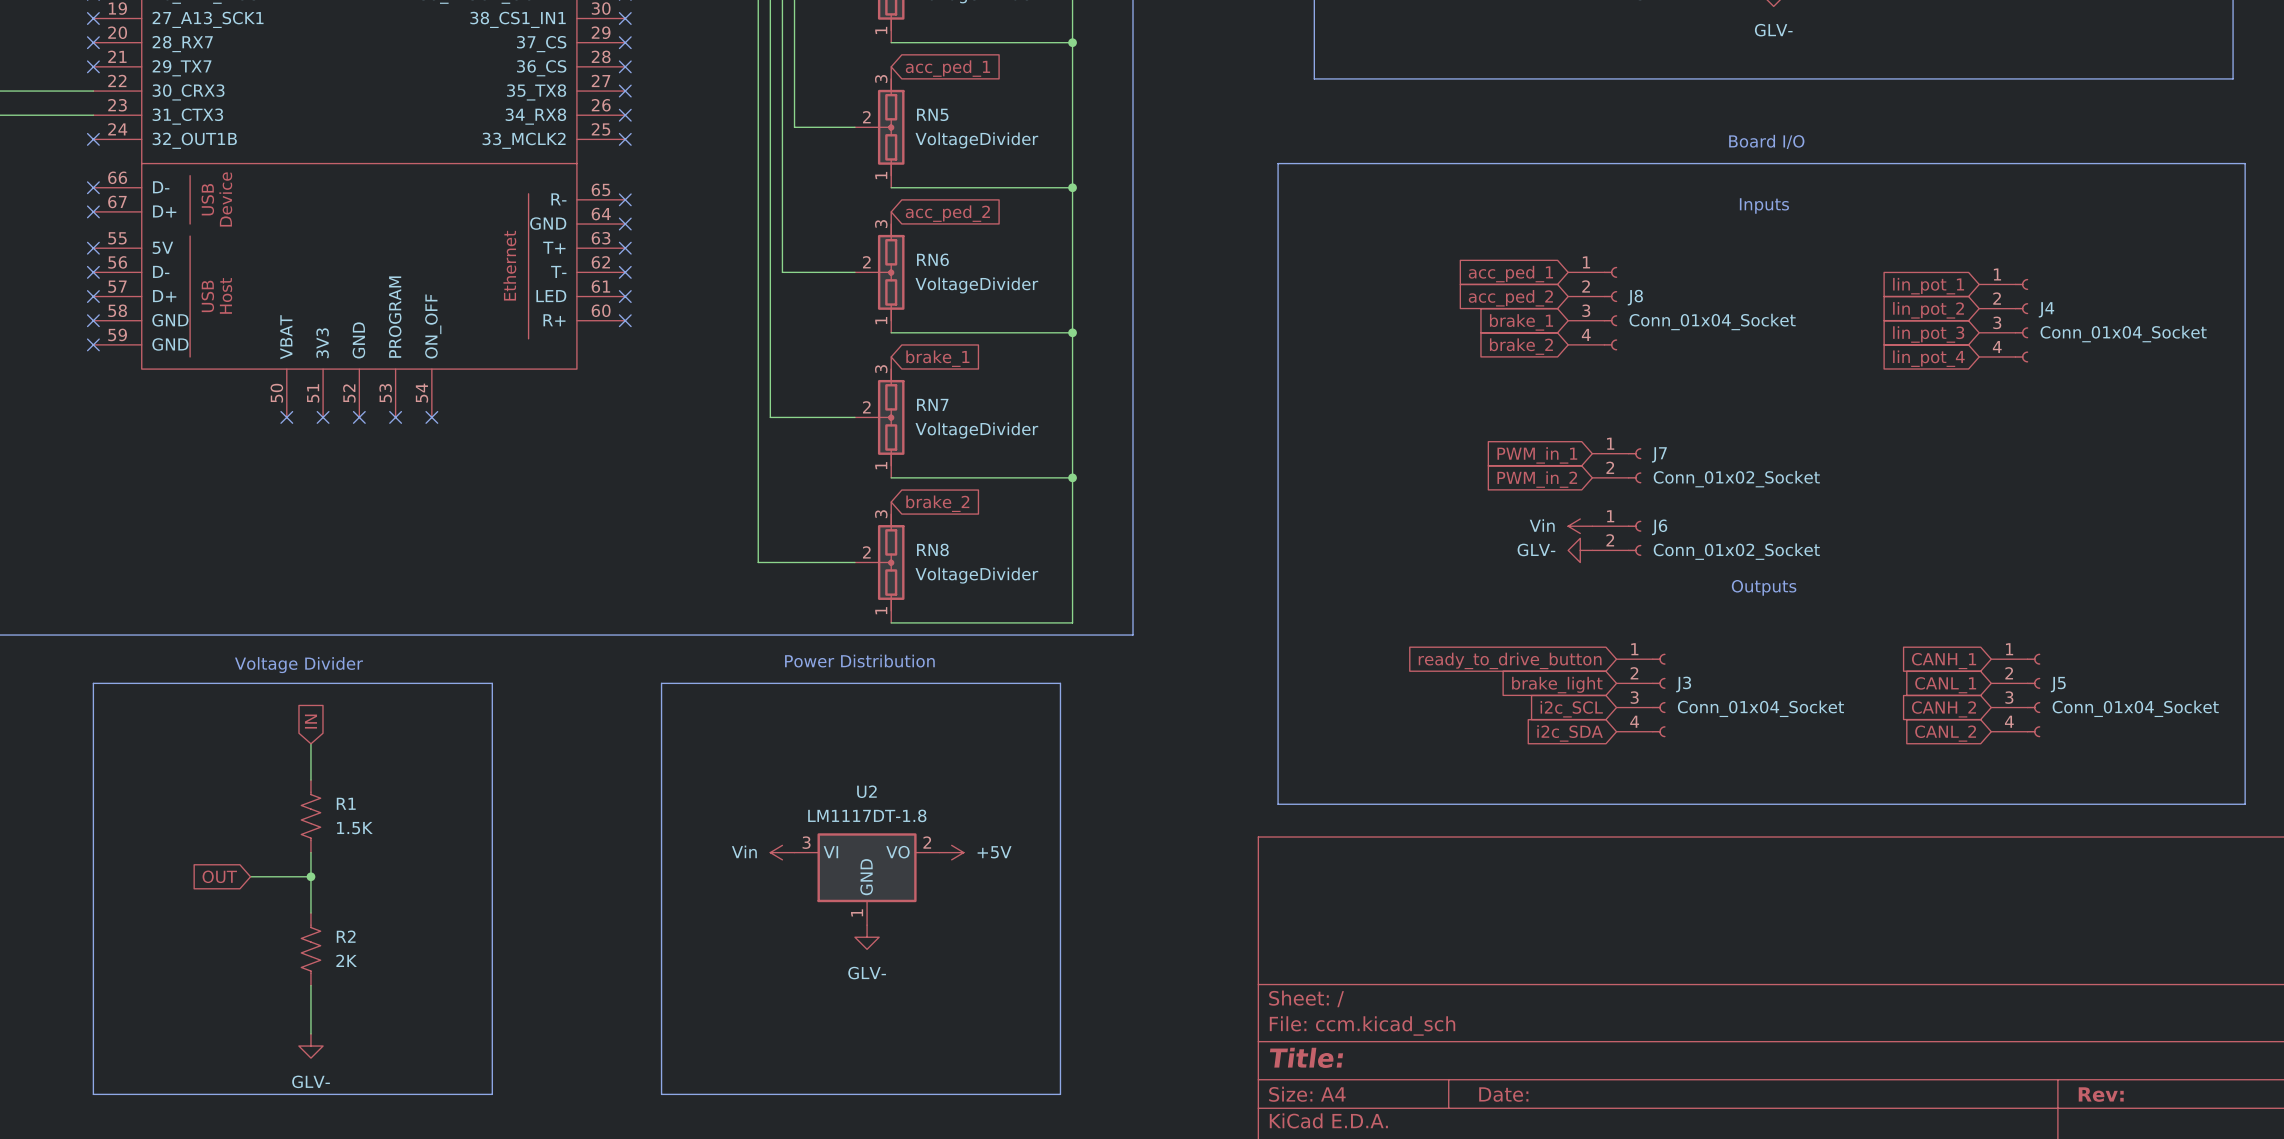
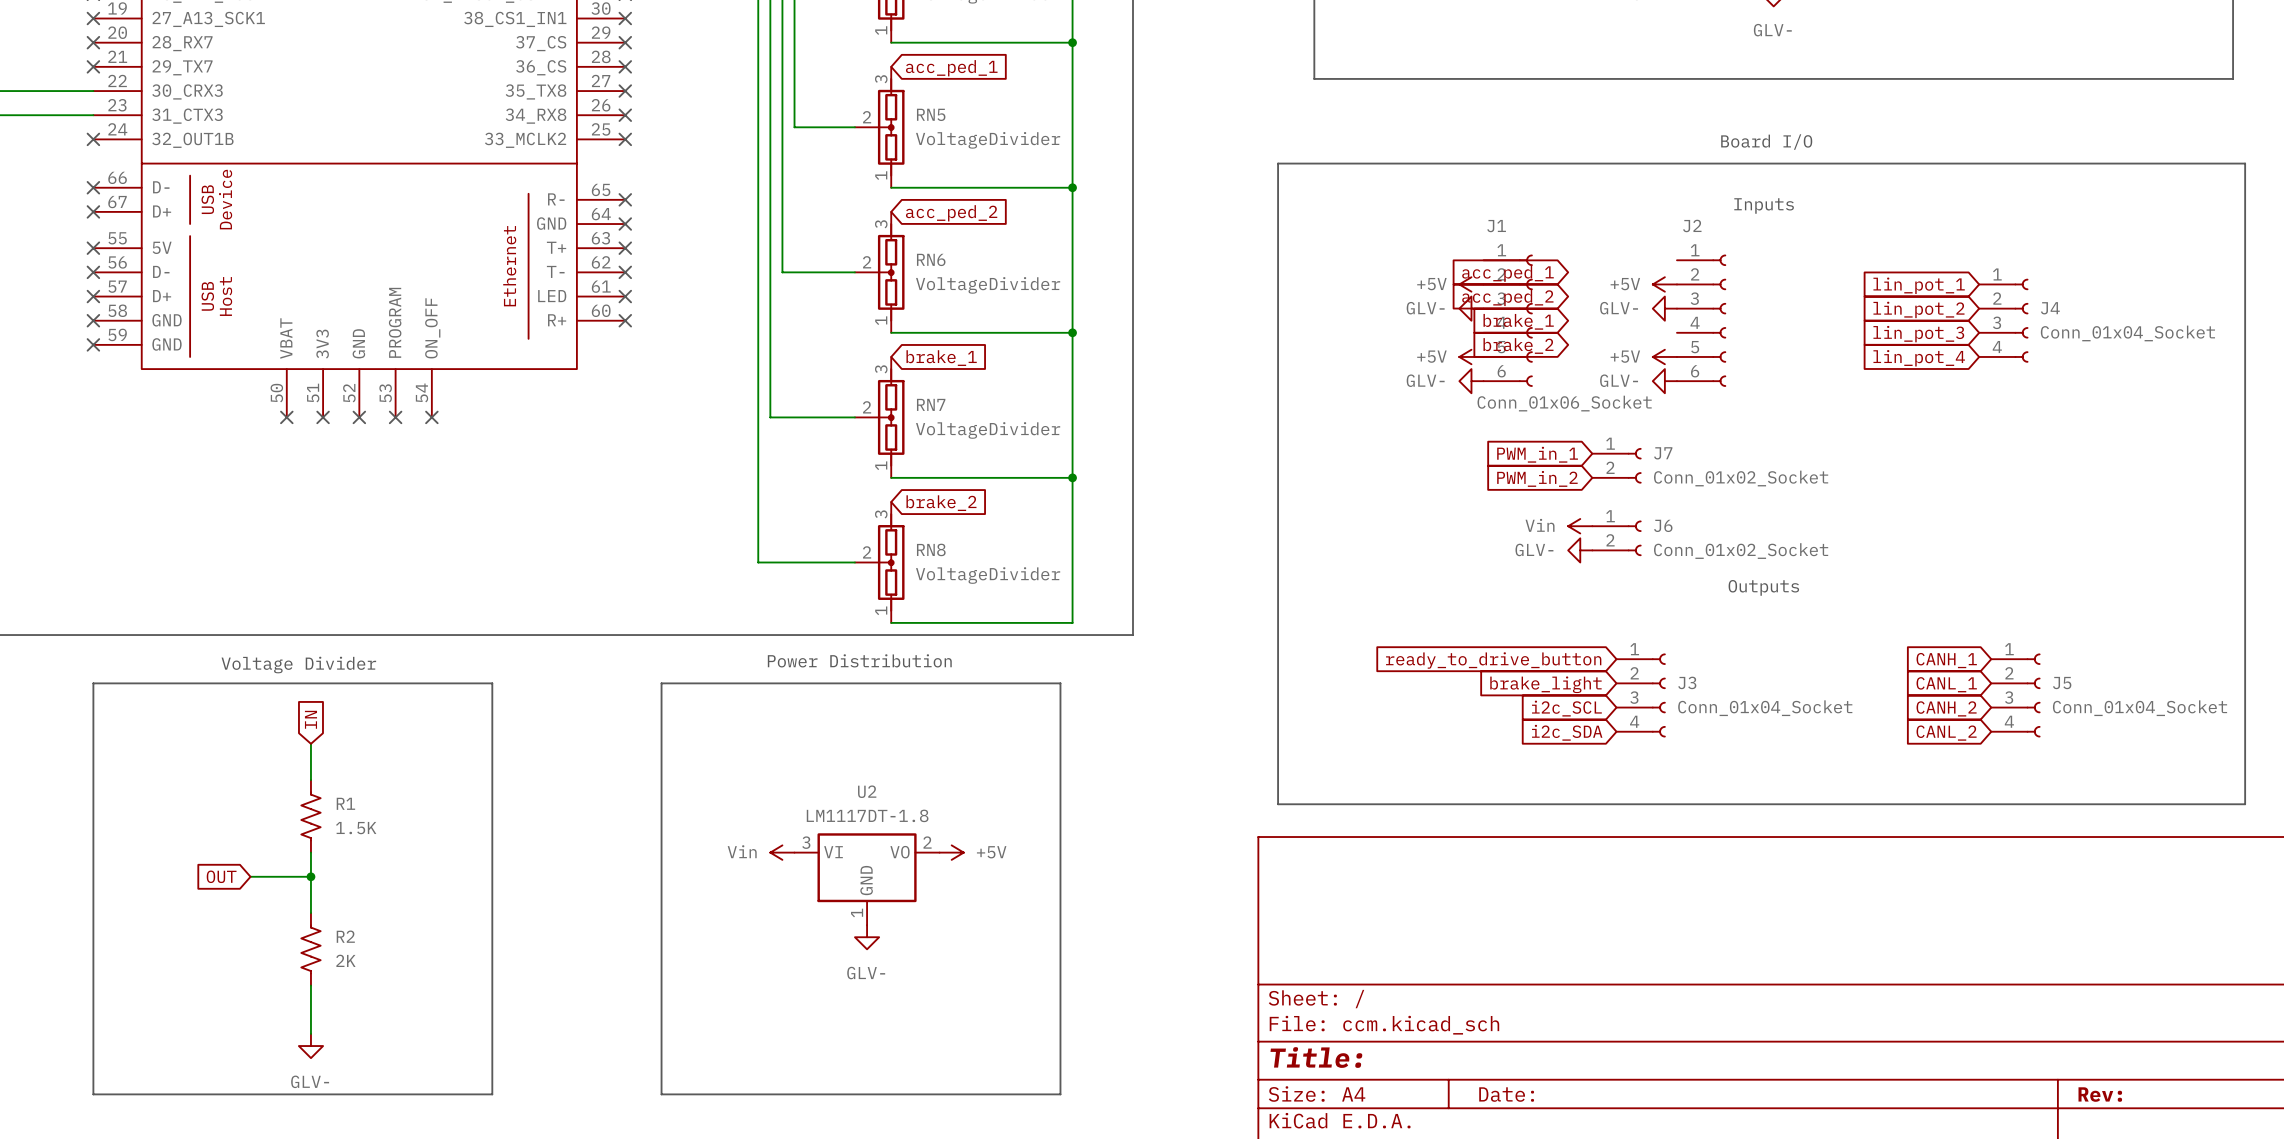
power symbol: none -> +5V (1471, 284)
power symbol: none -> +5V (1664, 284)
power symbol: none -> GLV- (1471, 308)
J8: Conn_01x04_Socket (1592, 308) -> none
power symbol: none -> GLV- (1664, 308)
J1: none -> Conn_01x06_Socket (1508, 320)
J2: none -> (1701, 320)
power symbol: none -> +5V (1471, 356)
power symbol: none -> +5V (1664, 356)
power symbol: none -> GLV- (1471, 381)
power symbol: none -> GLV- (1664, 381)

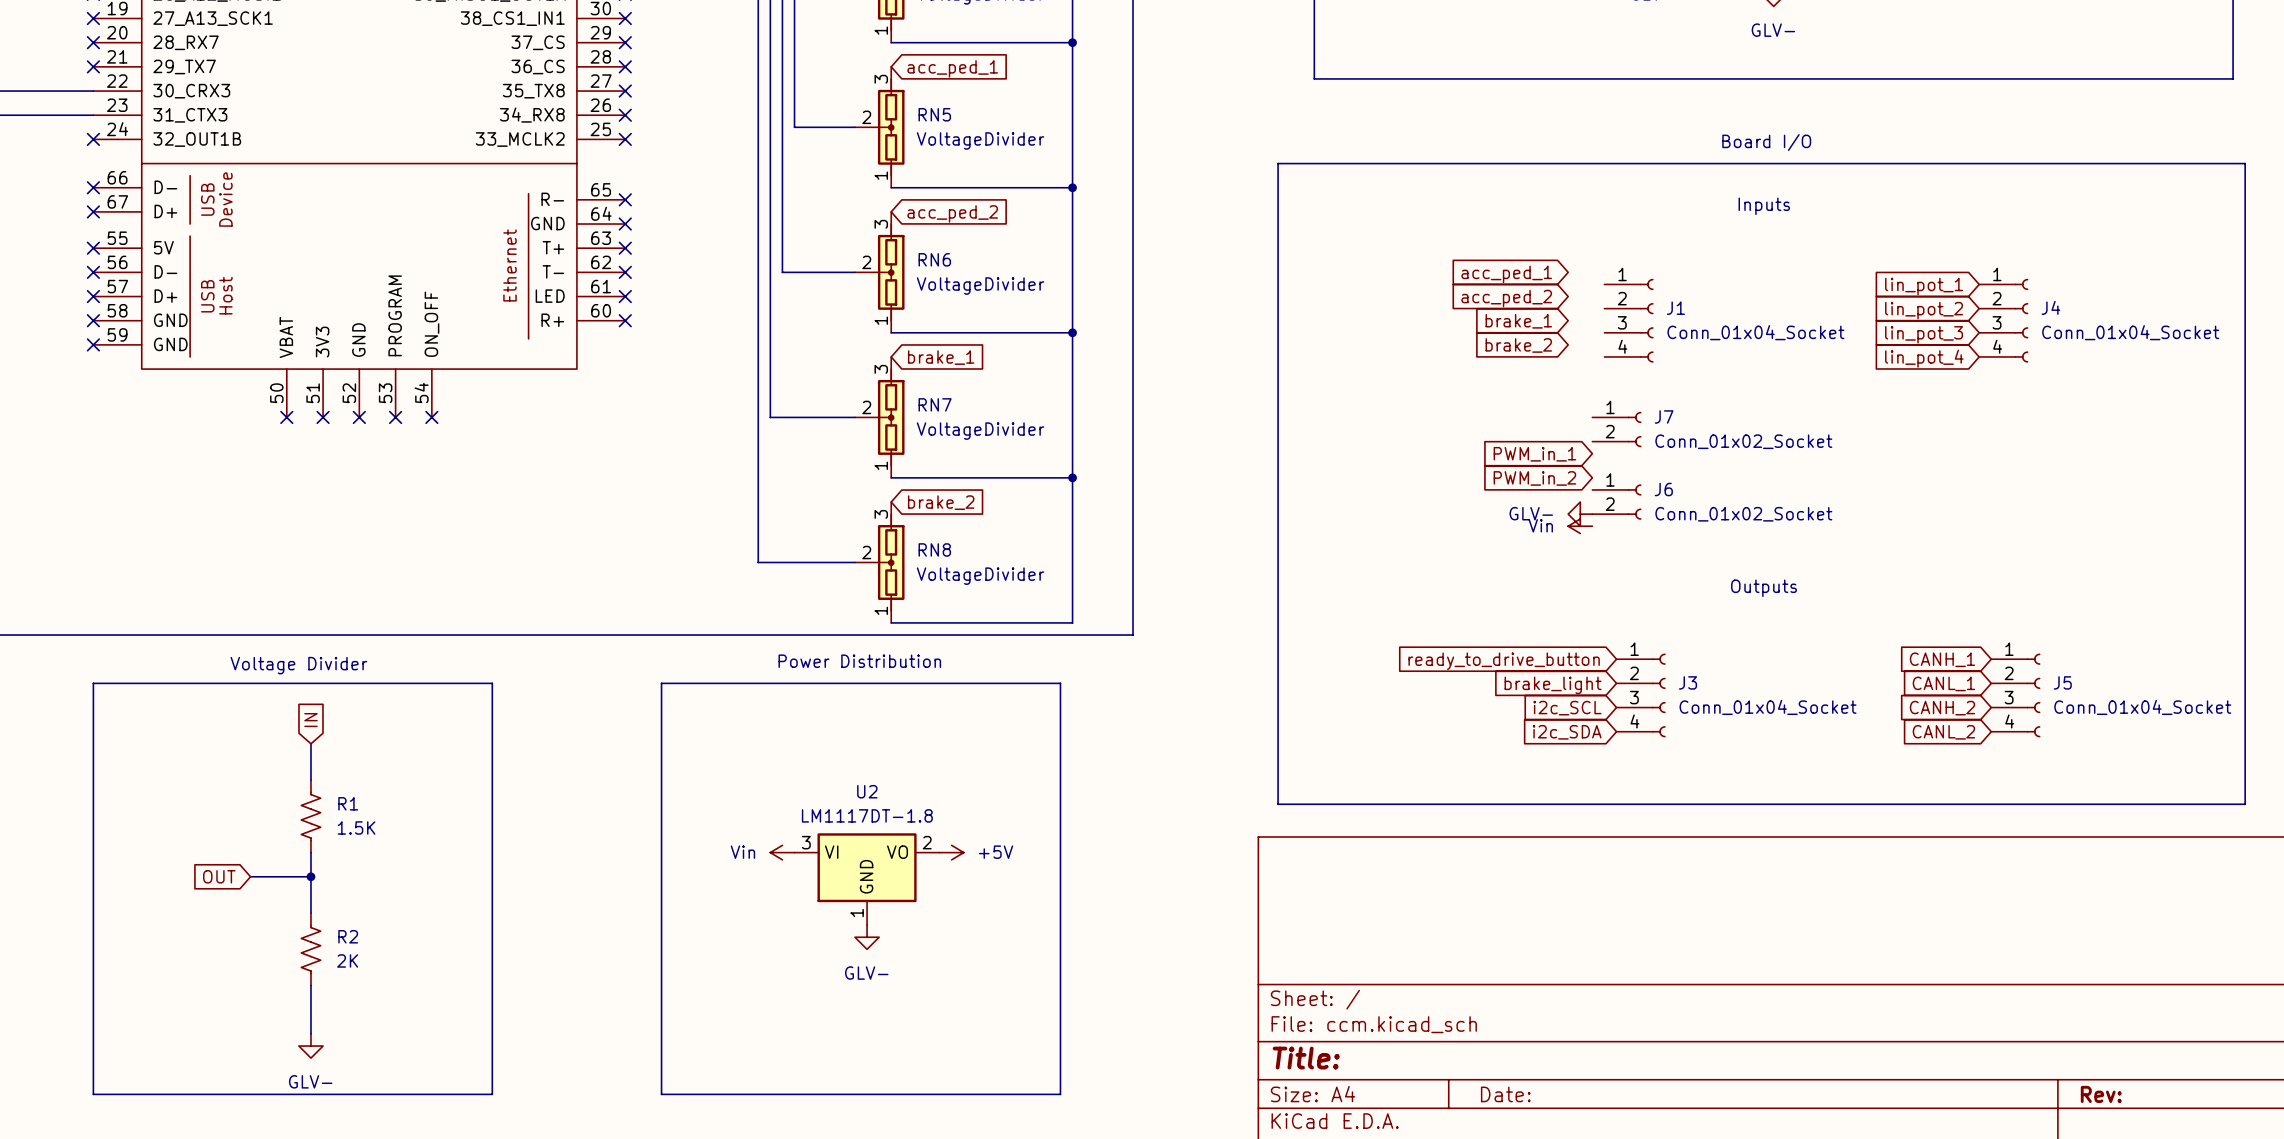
J1 name position: J1 (1496, 226) -> J1 (1675, 308)
J1 symbol: [1483, 254, 1533, 387] -> [1604, 278, 1654, 363]
power symbol: +5V (1471, 284) -> none
power symbol: +5V (1664, 284) -> none
power symbol: GLV- (1471, 308) -> none
power symbol: GLV- (1664, 308) -> none
J2: (1701, 320) -> none
power symbol: +5V (1471, 356) -> none
power symbol: +5V (1664, 356) -> none
power symbol: GLV- (1471, 381) -> none
power symbol: GLV- (1664, 381) -> none
J1 value: Conn_01x06_Socket (1564, 403) -> Conn_01x04_Socket (1755, 332)
J7 position: (1616, 465) -> (1616, 429)
J6 position: (1616, 538) -> (1616, 502)
power symbol position: GLV- (1580, 550) -> GLV- (1580, 514)

